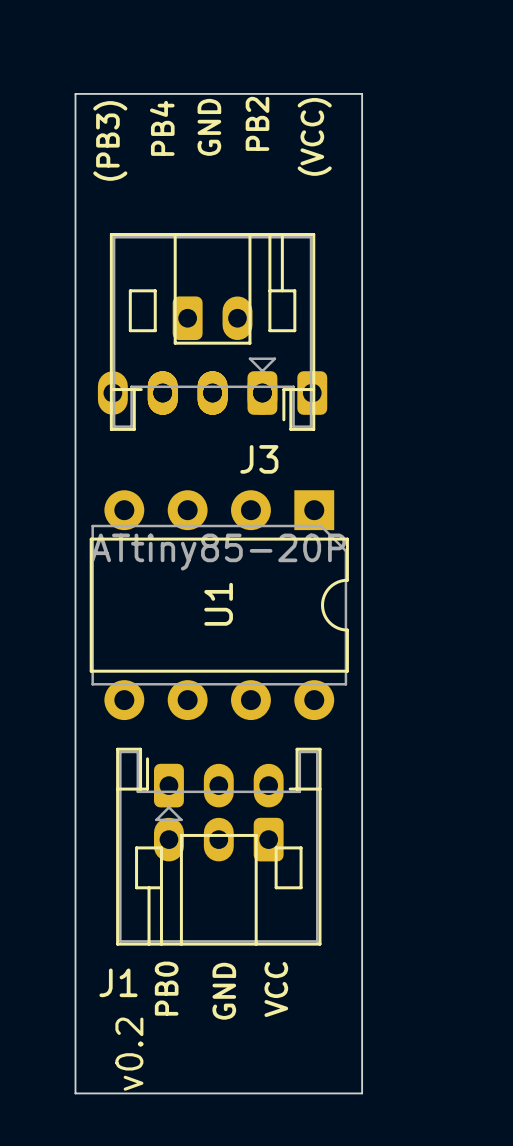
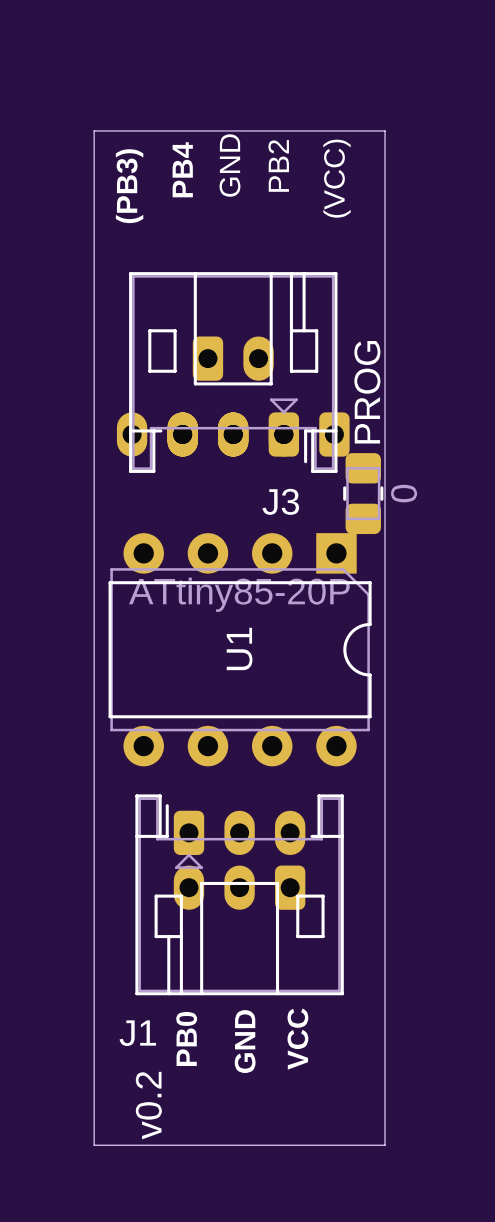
PROG: none -> 0 (363, 493)

